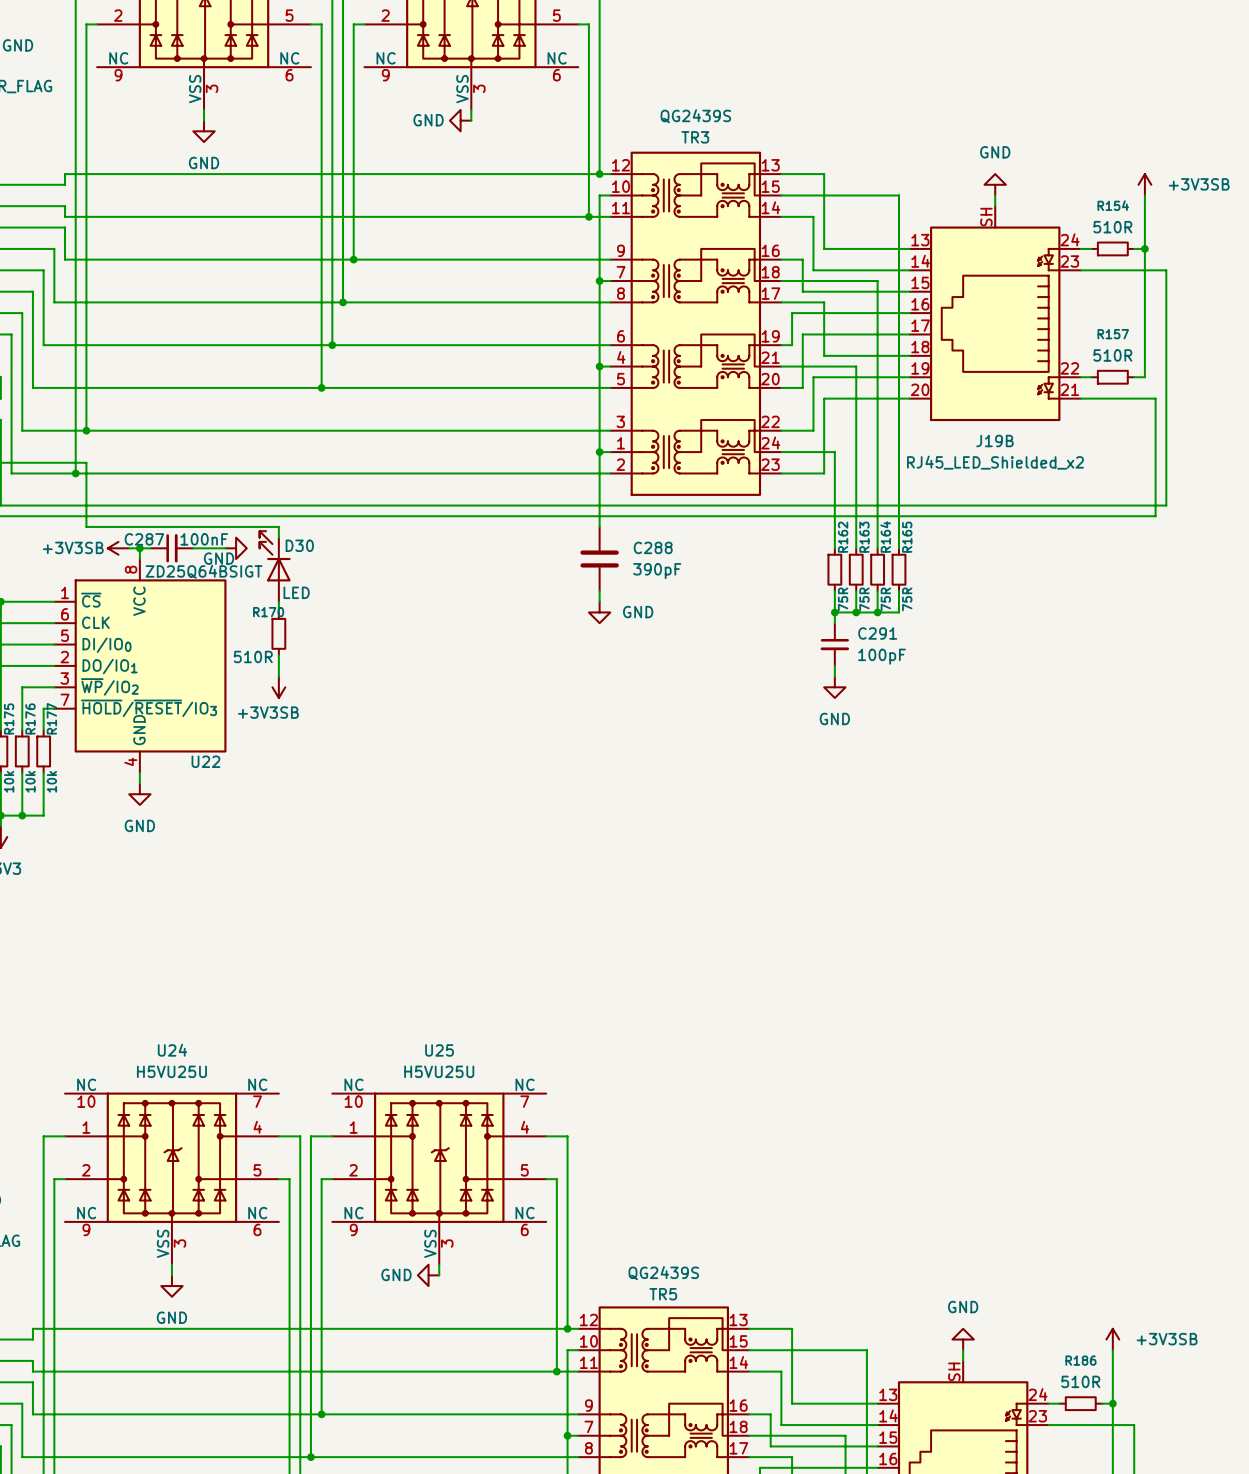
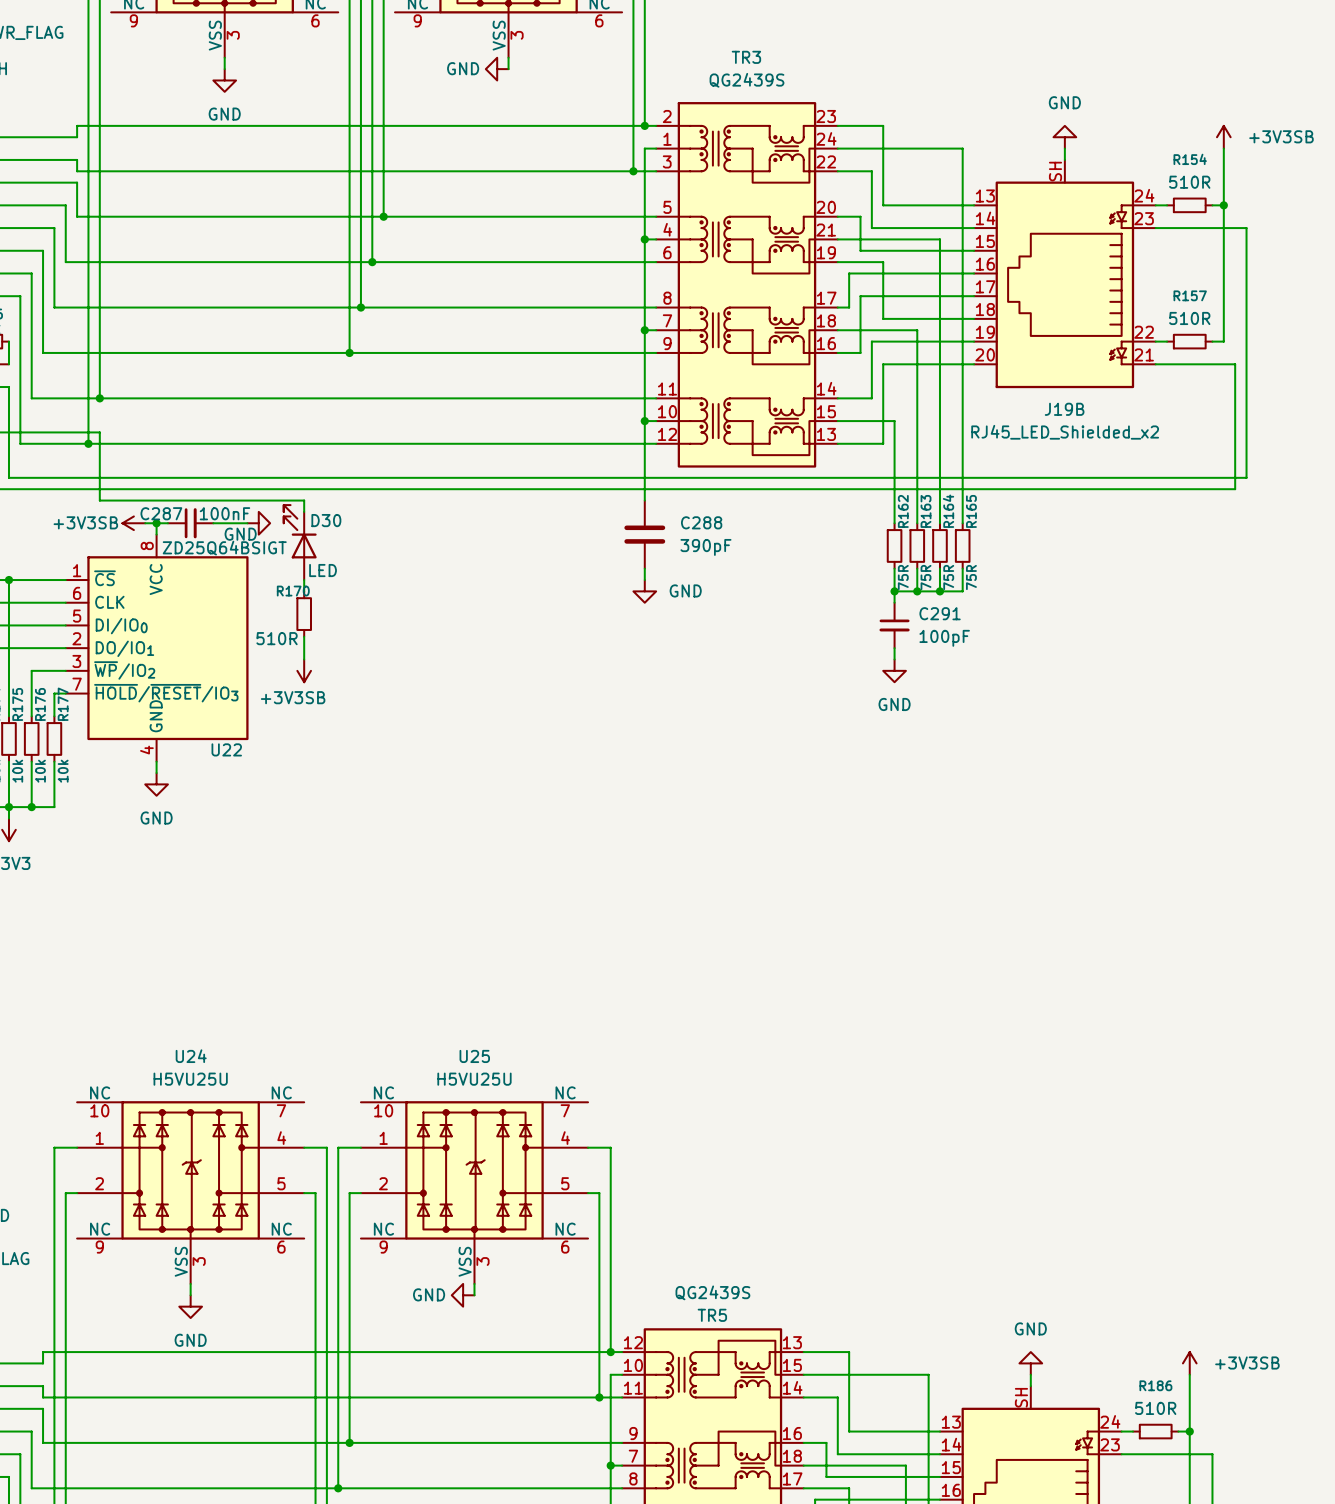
TR3 name position: TR3 (695, 137) -> TR3 (746, 57)
TR3 flip: as is (695, 323) -> up-down (746, 284)

